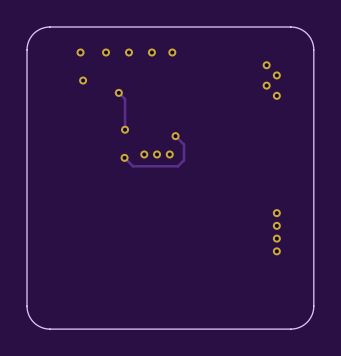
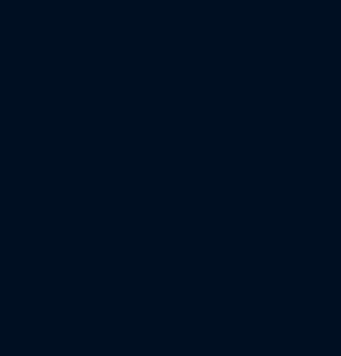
board edge: (290, 27) (49, 27) (38, 30) (31, 35) (27, 49) (27, 306) (30, 317) (35, 324) (49, 329) (290, 329) (299, 327) (309, 320) (313, 306) (313, 49) (312, 41) (307, 33) (299, 28) (290, 27) -> none
via: (80, 52) -> none
via: (106, 52) -> none
via: (128, 52) -> none
via: (151, 52) -> none
via: (172, 52) -> none
via: (266, 65) -> none
via: (276, 75) -> none
via: (83, 80) -> none
via: (266, 85) -> none
track: (118, 92) (125, 99) (125, 129) -> none
via: (118, 92) -> none
via: (276, 95) -> none
via: (125, 129) -> none
track: (175, 136) (184, 144) (184, 160) (178, 166) (132, 166) (124, 157) -> none
via: (175, 136) -> none
via: (144, 154) -> none
via: (157, 154) -> none
via: (169, 154) -> none
via: (124, 157) -> none
via: (276, 213) -> none
via: (276, 225) -> none
via: (276, 238) -> none
via: (276, 251) -> none

